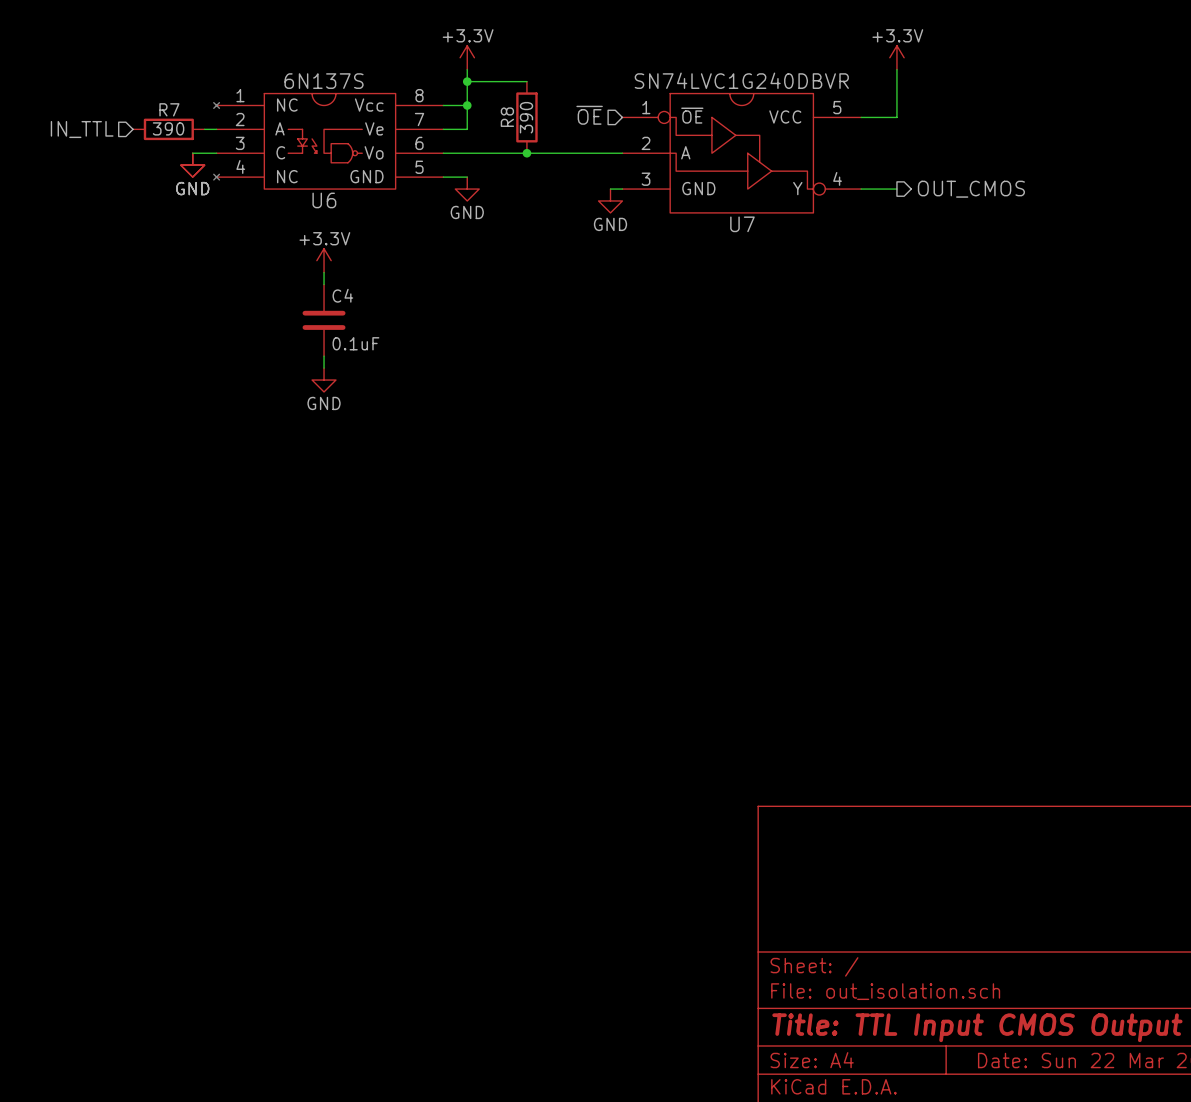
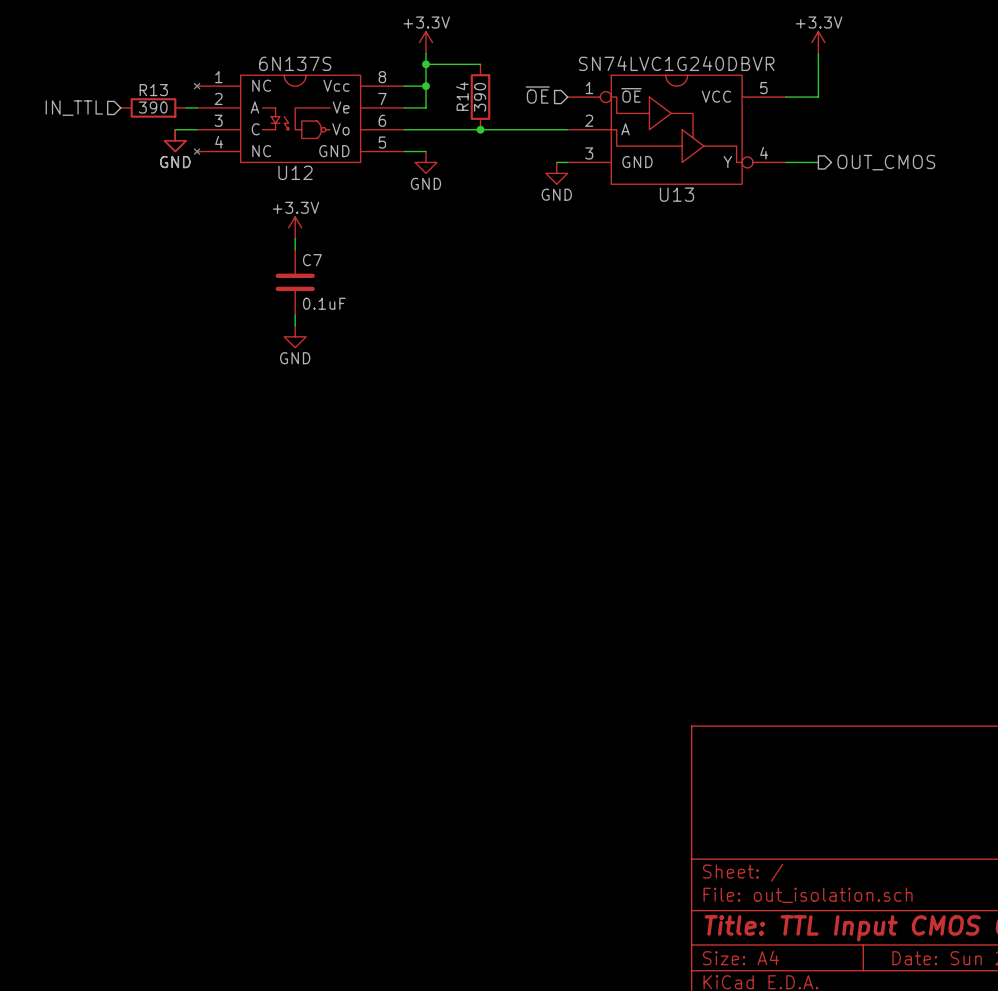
R7 name: R7 (169, 109) -> R13 (153, 90)
R8 name: R8 (507, 117) -> R14 (462, 96)
U6 name: U6 (324, 200) -> U12 (295, 172)
U7 name: U7 (742, 224) -> U13 (677, 194)
C4 name: C4 (342, 295) -> C7 (312, 260)

